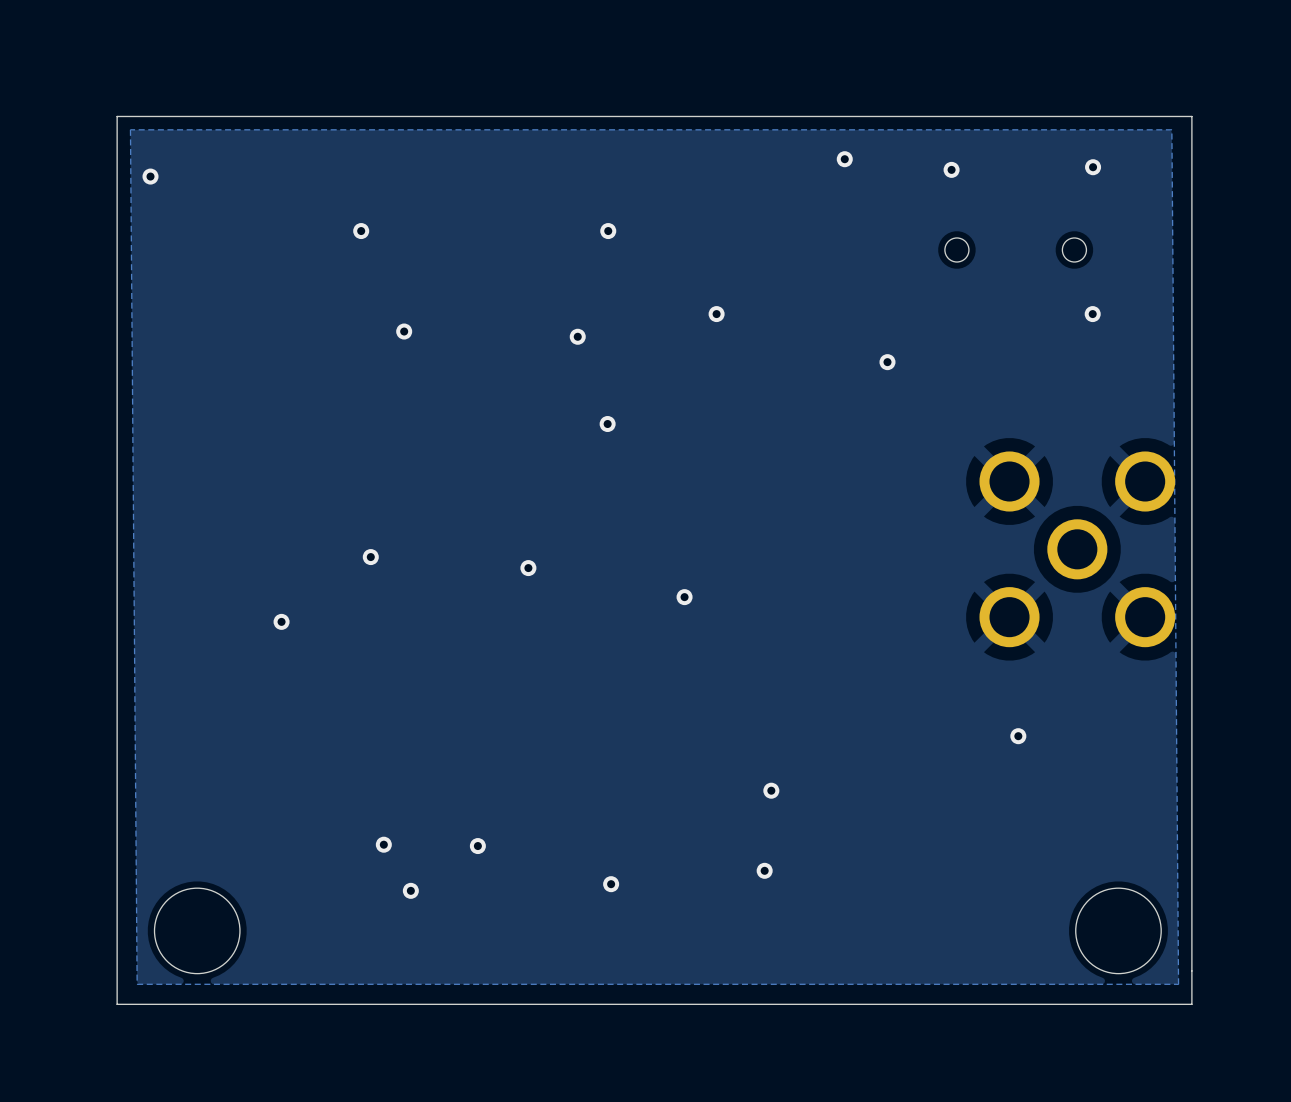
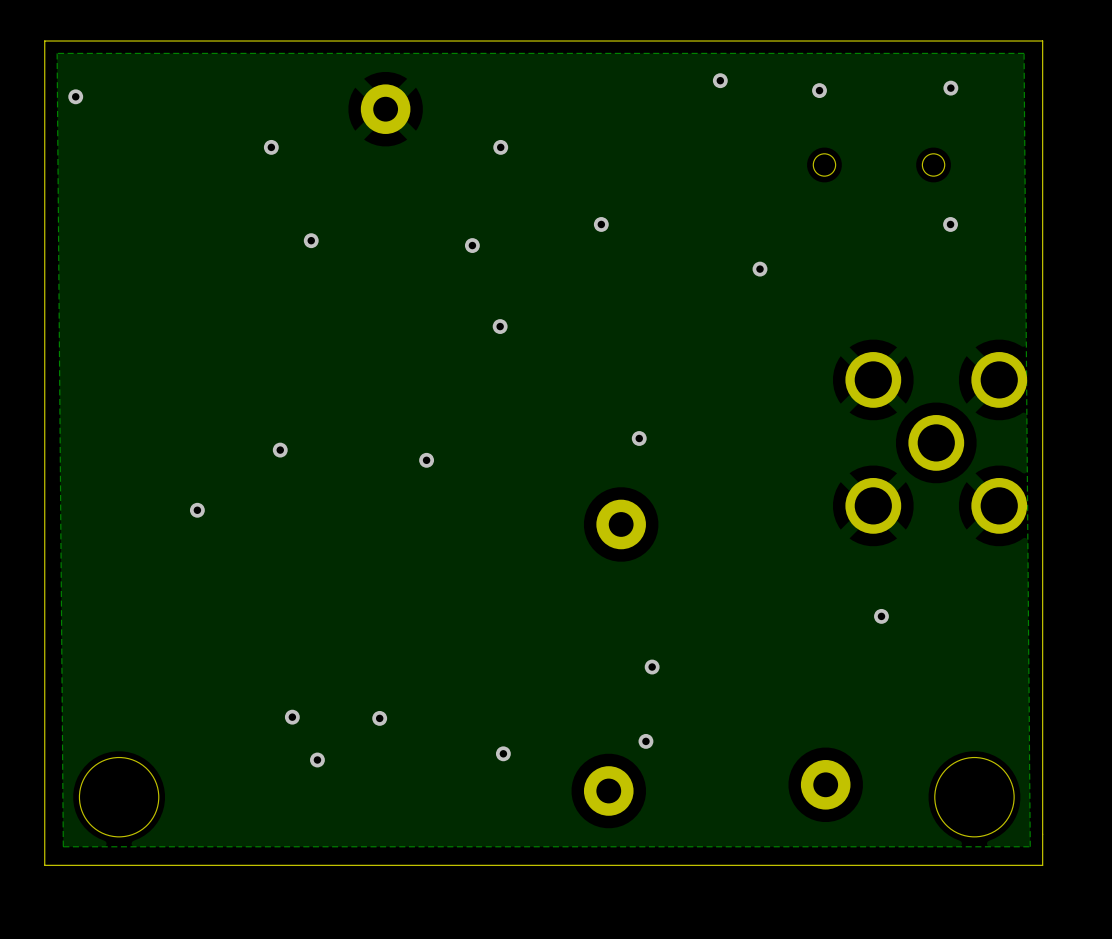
part: none -> (385, 109)
via position: (684, 597) -> (639, 438)
part: none -> (621, 524)
part: none -> (825, 784)
part: none -> (608, 790)

